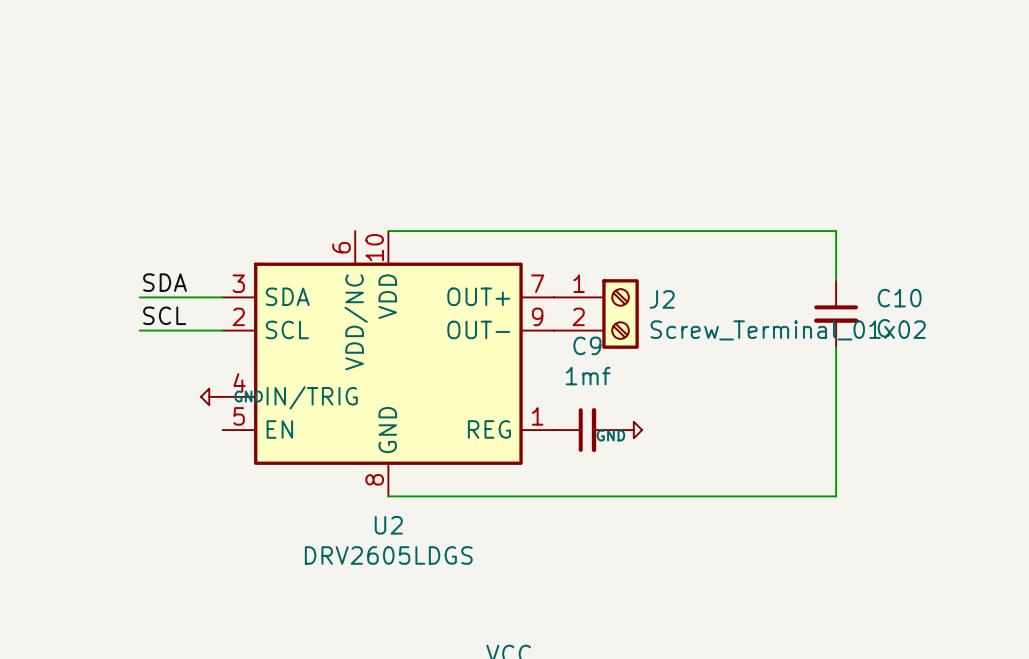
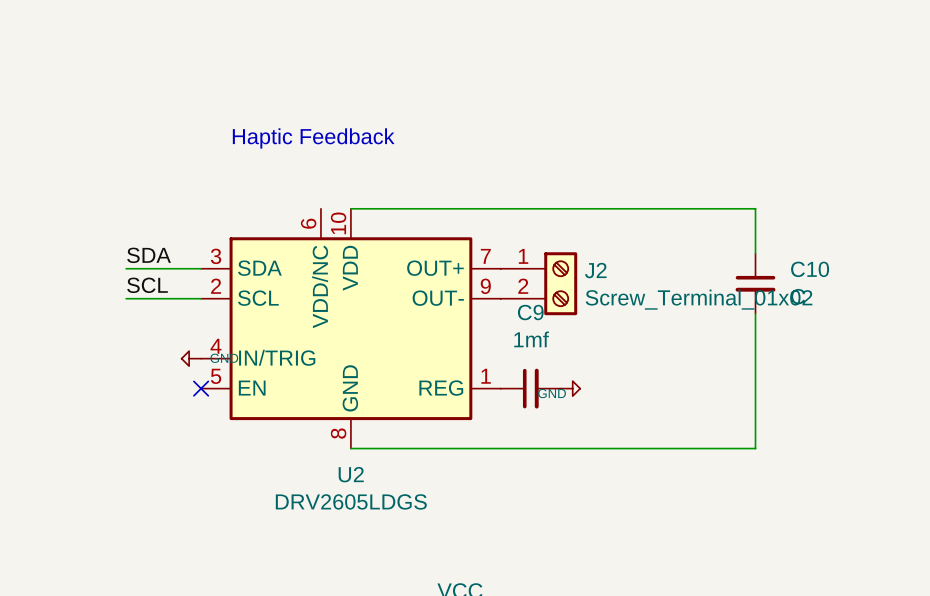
text: none -> Haptic Feedback (313, 138)
no-connect mark: none -> (201, 388)

